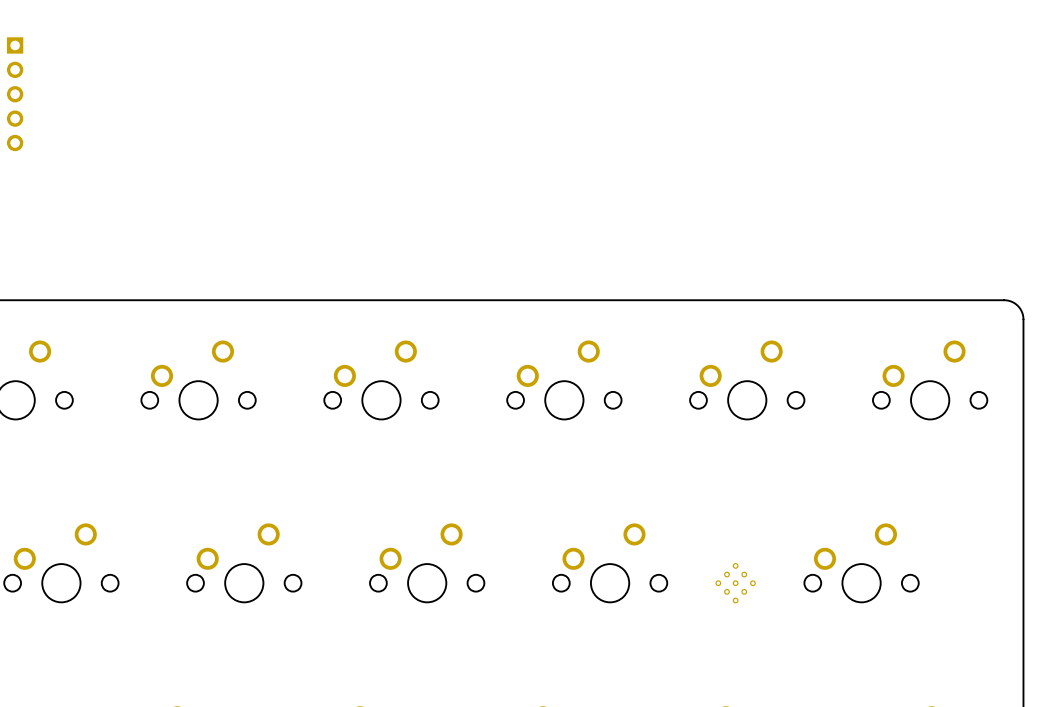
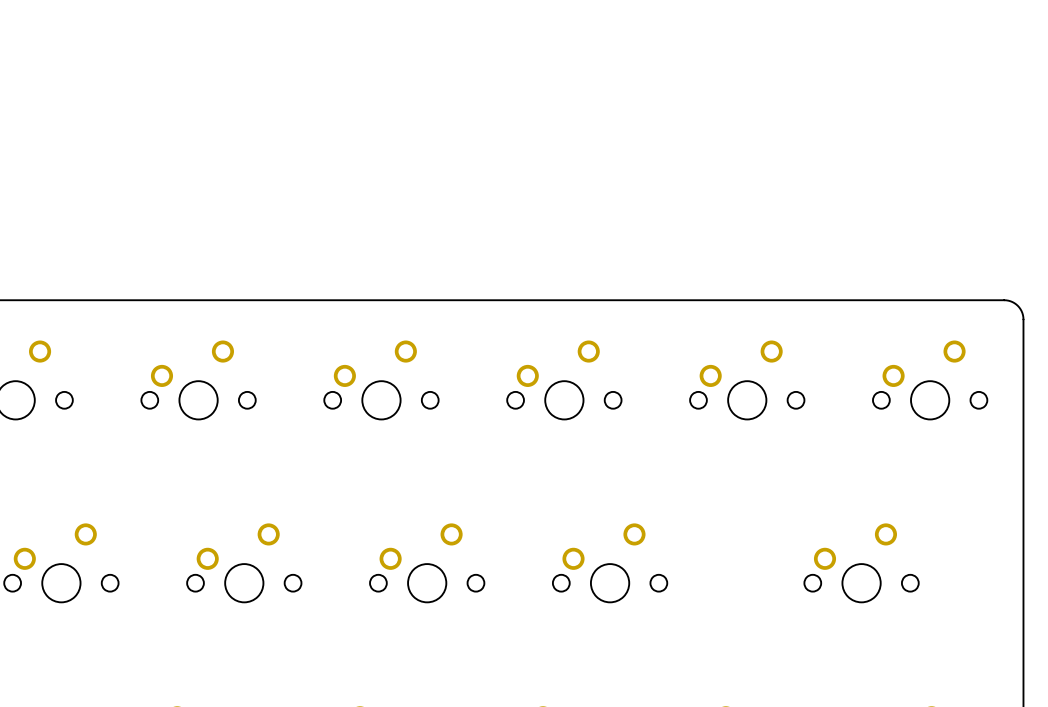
part: (15, 94) -> none
part: (735, 583) -> none

